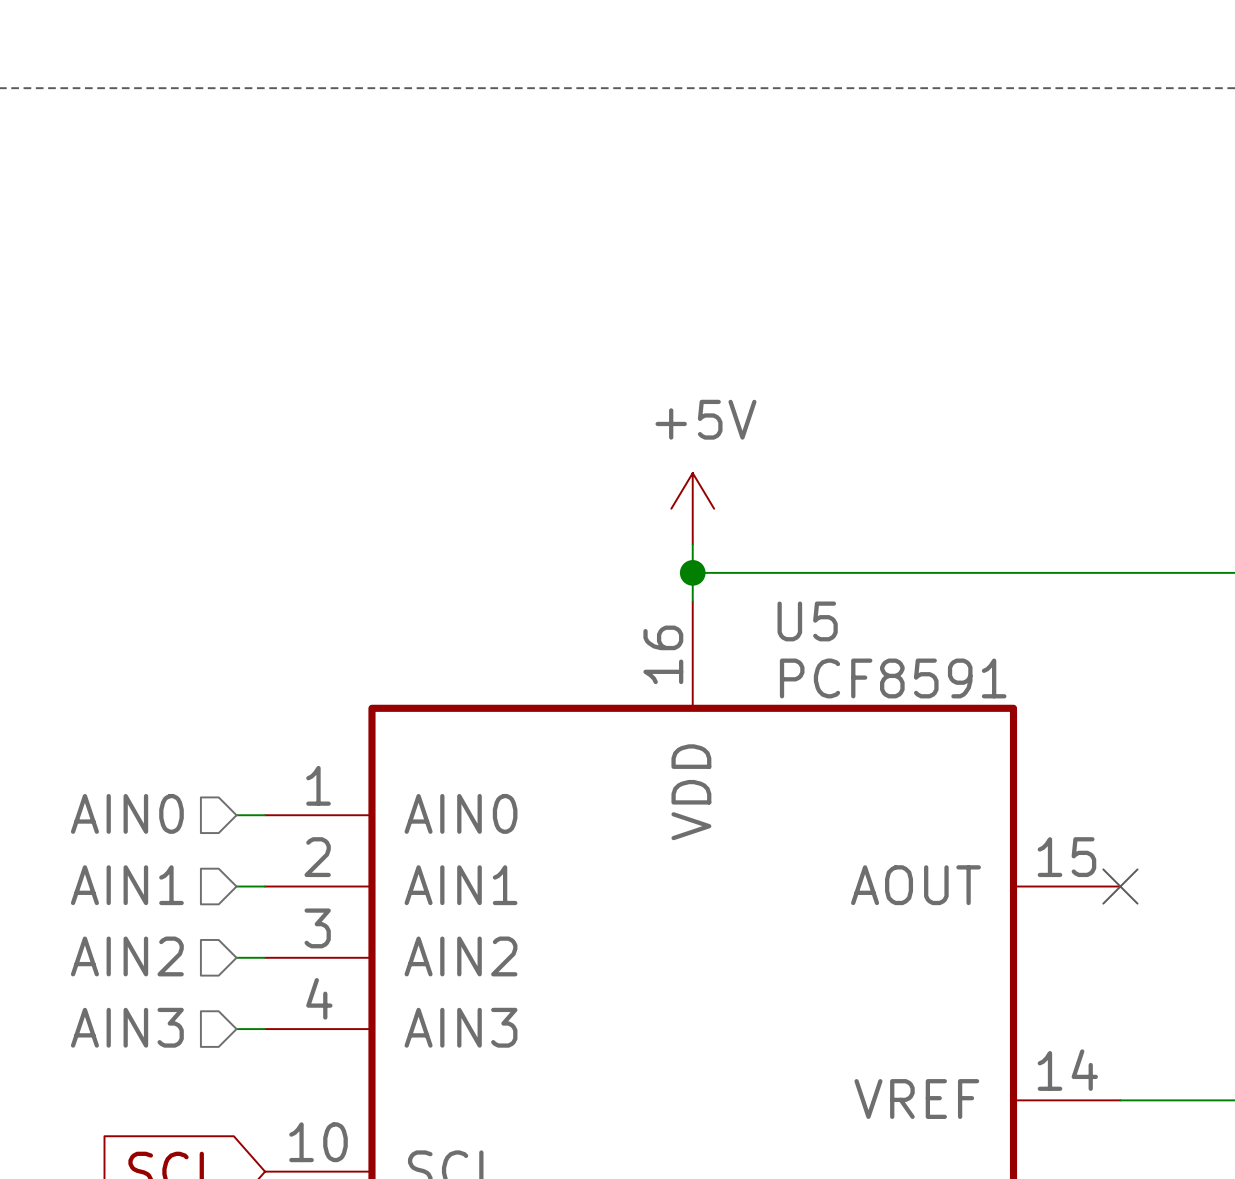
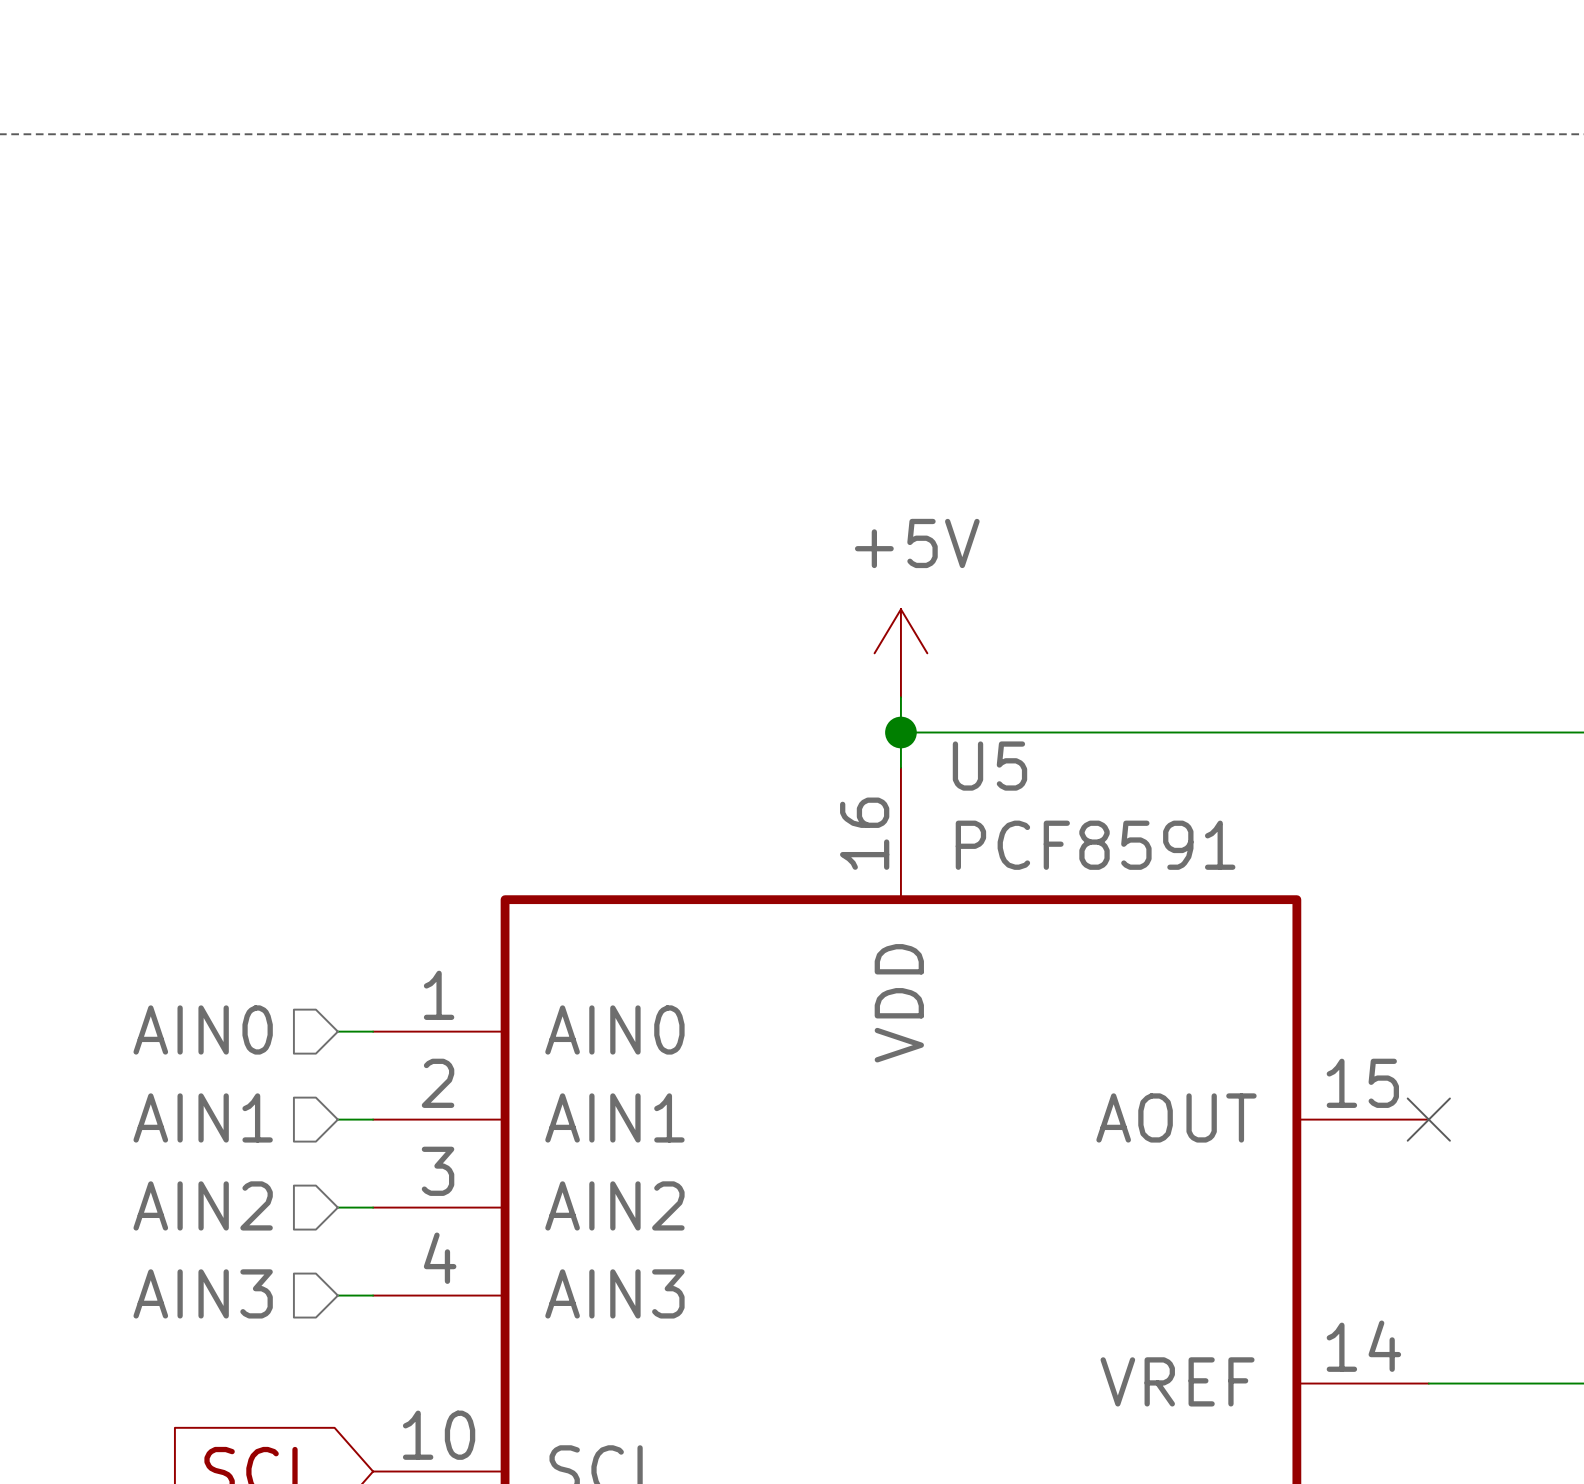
U5 name position: U5 (807, 621) -> U5 (989, 766)
U5 value position: PCF8591 (893, 678) -> PCF8591 (1095, 845)

